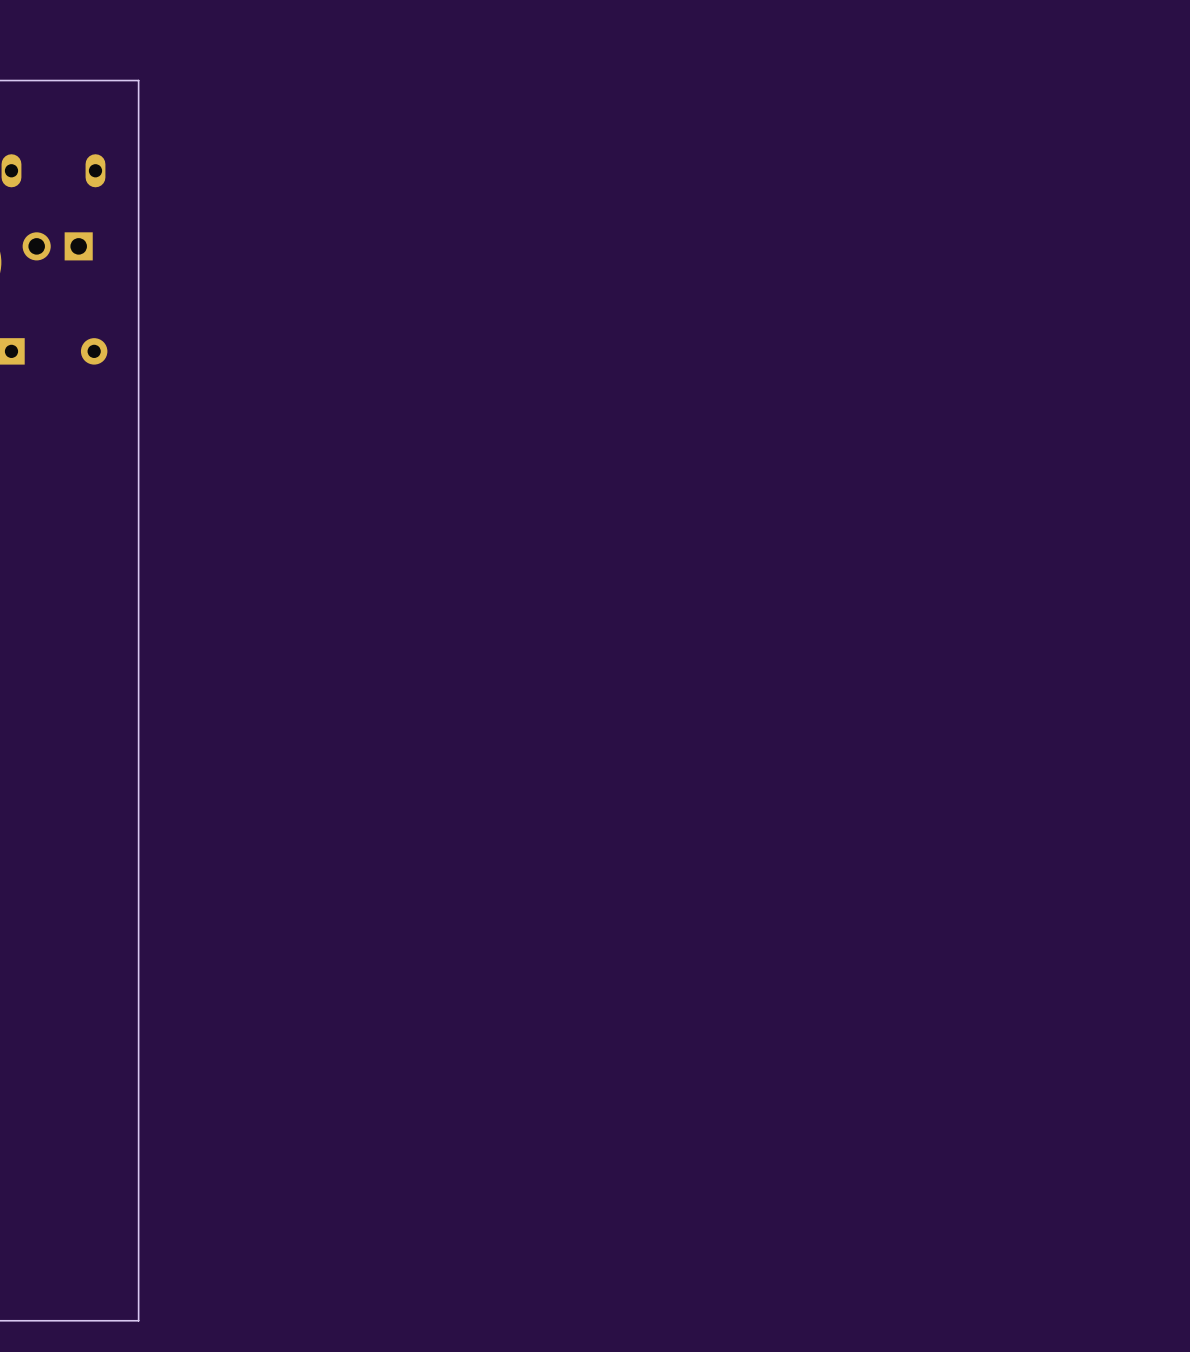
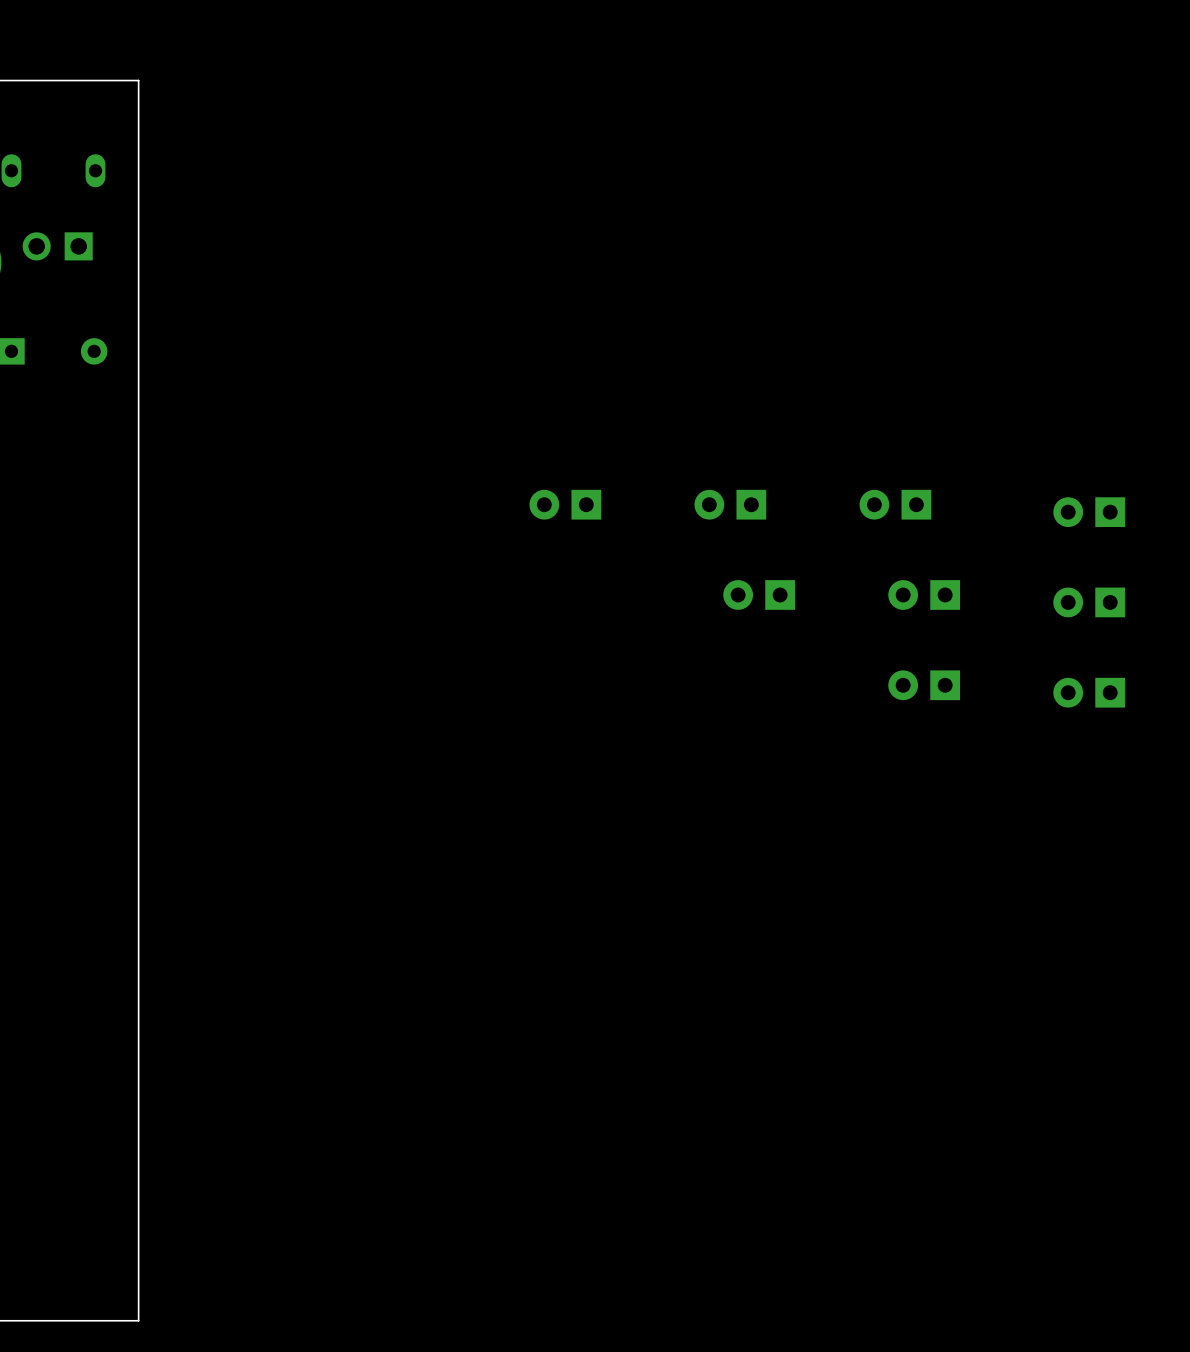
part: none -> (565, 504)
part: none -> (730, 504)
part: none -> (895, 504)
part: none -> (1089, 512)
part: none -> (759, 594)
part: none -> (924, 594)
part: none -> (1089, 602)
part: none -> (924, 685)
part: none -> (1089, 692)

